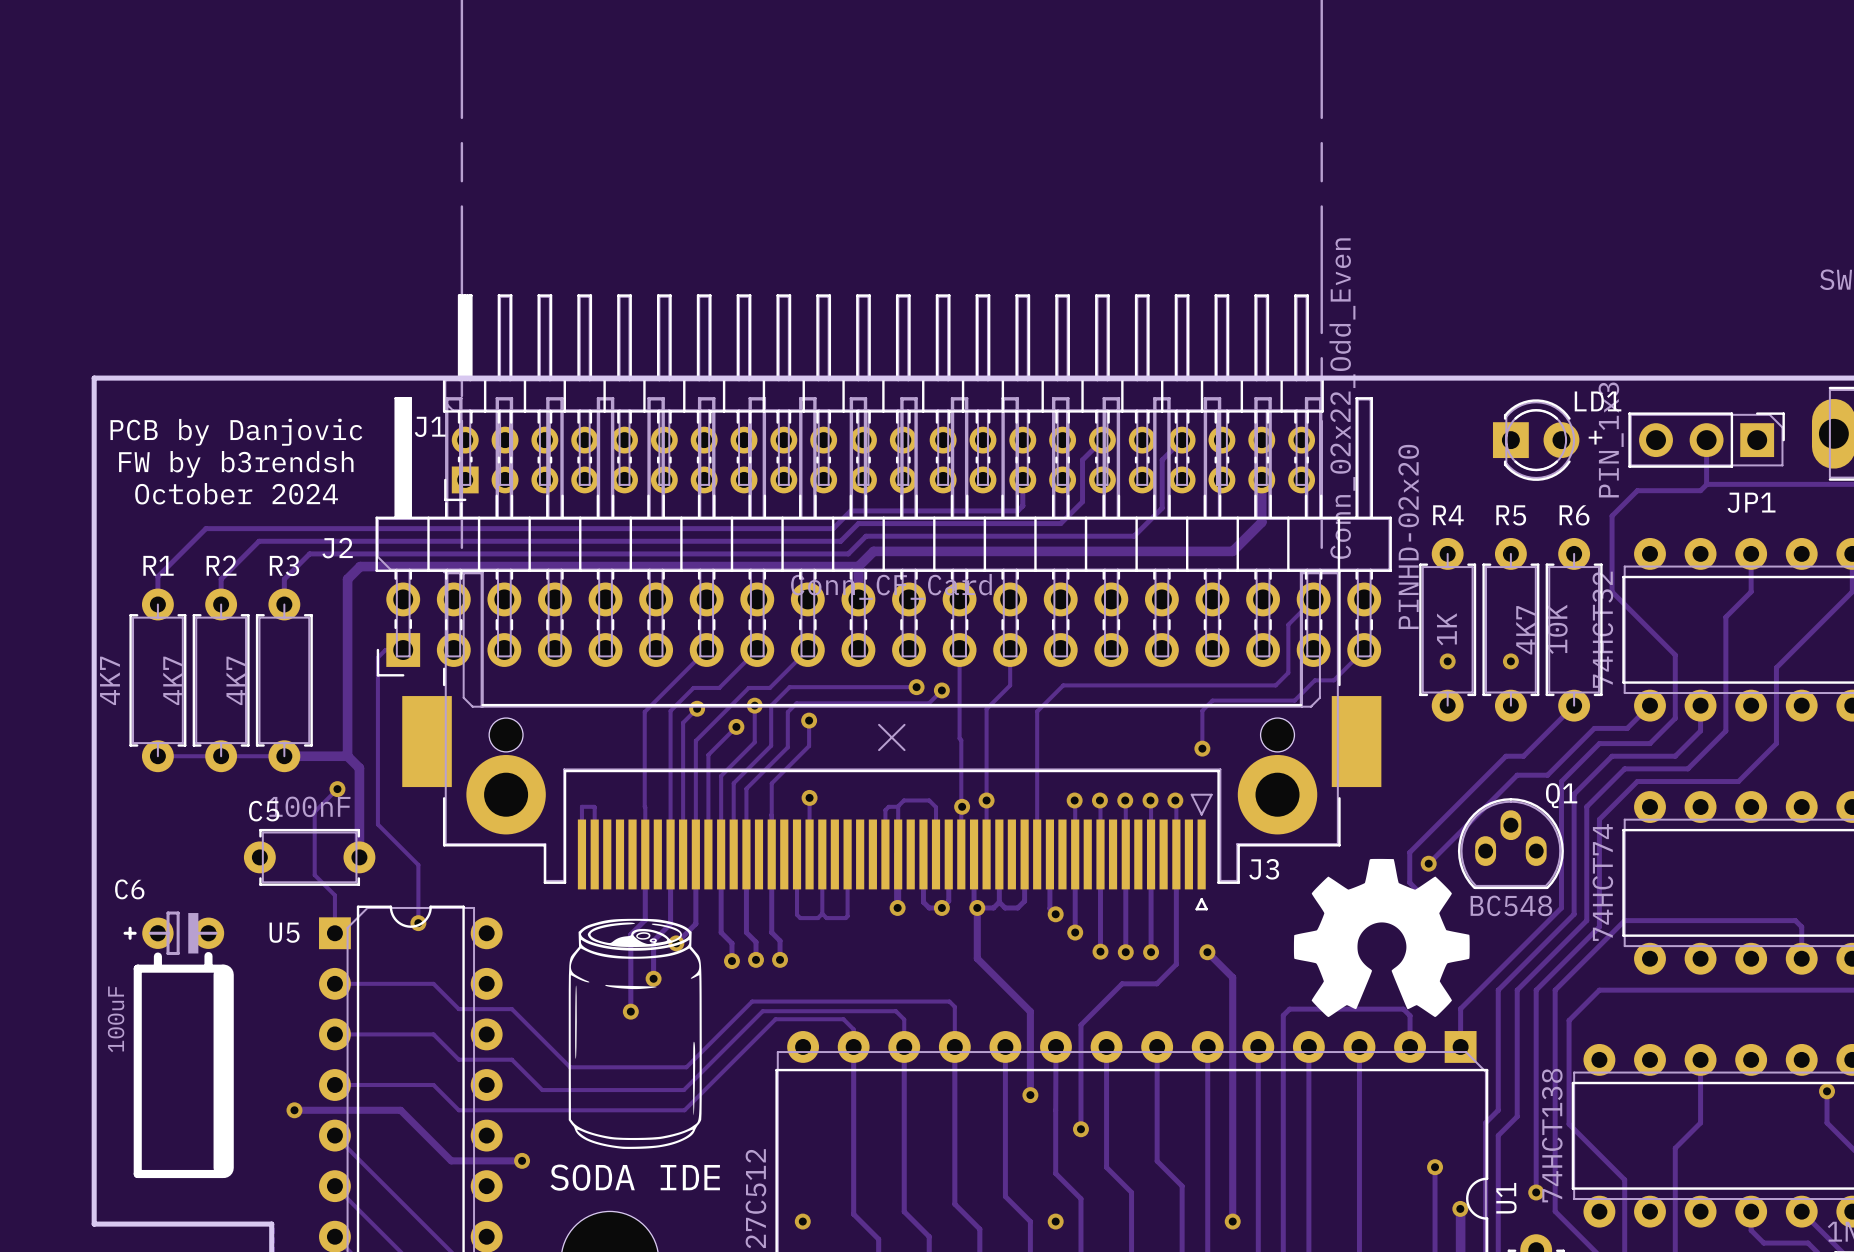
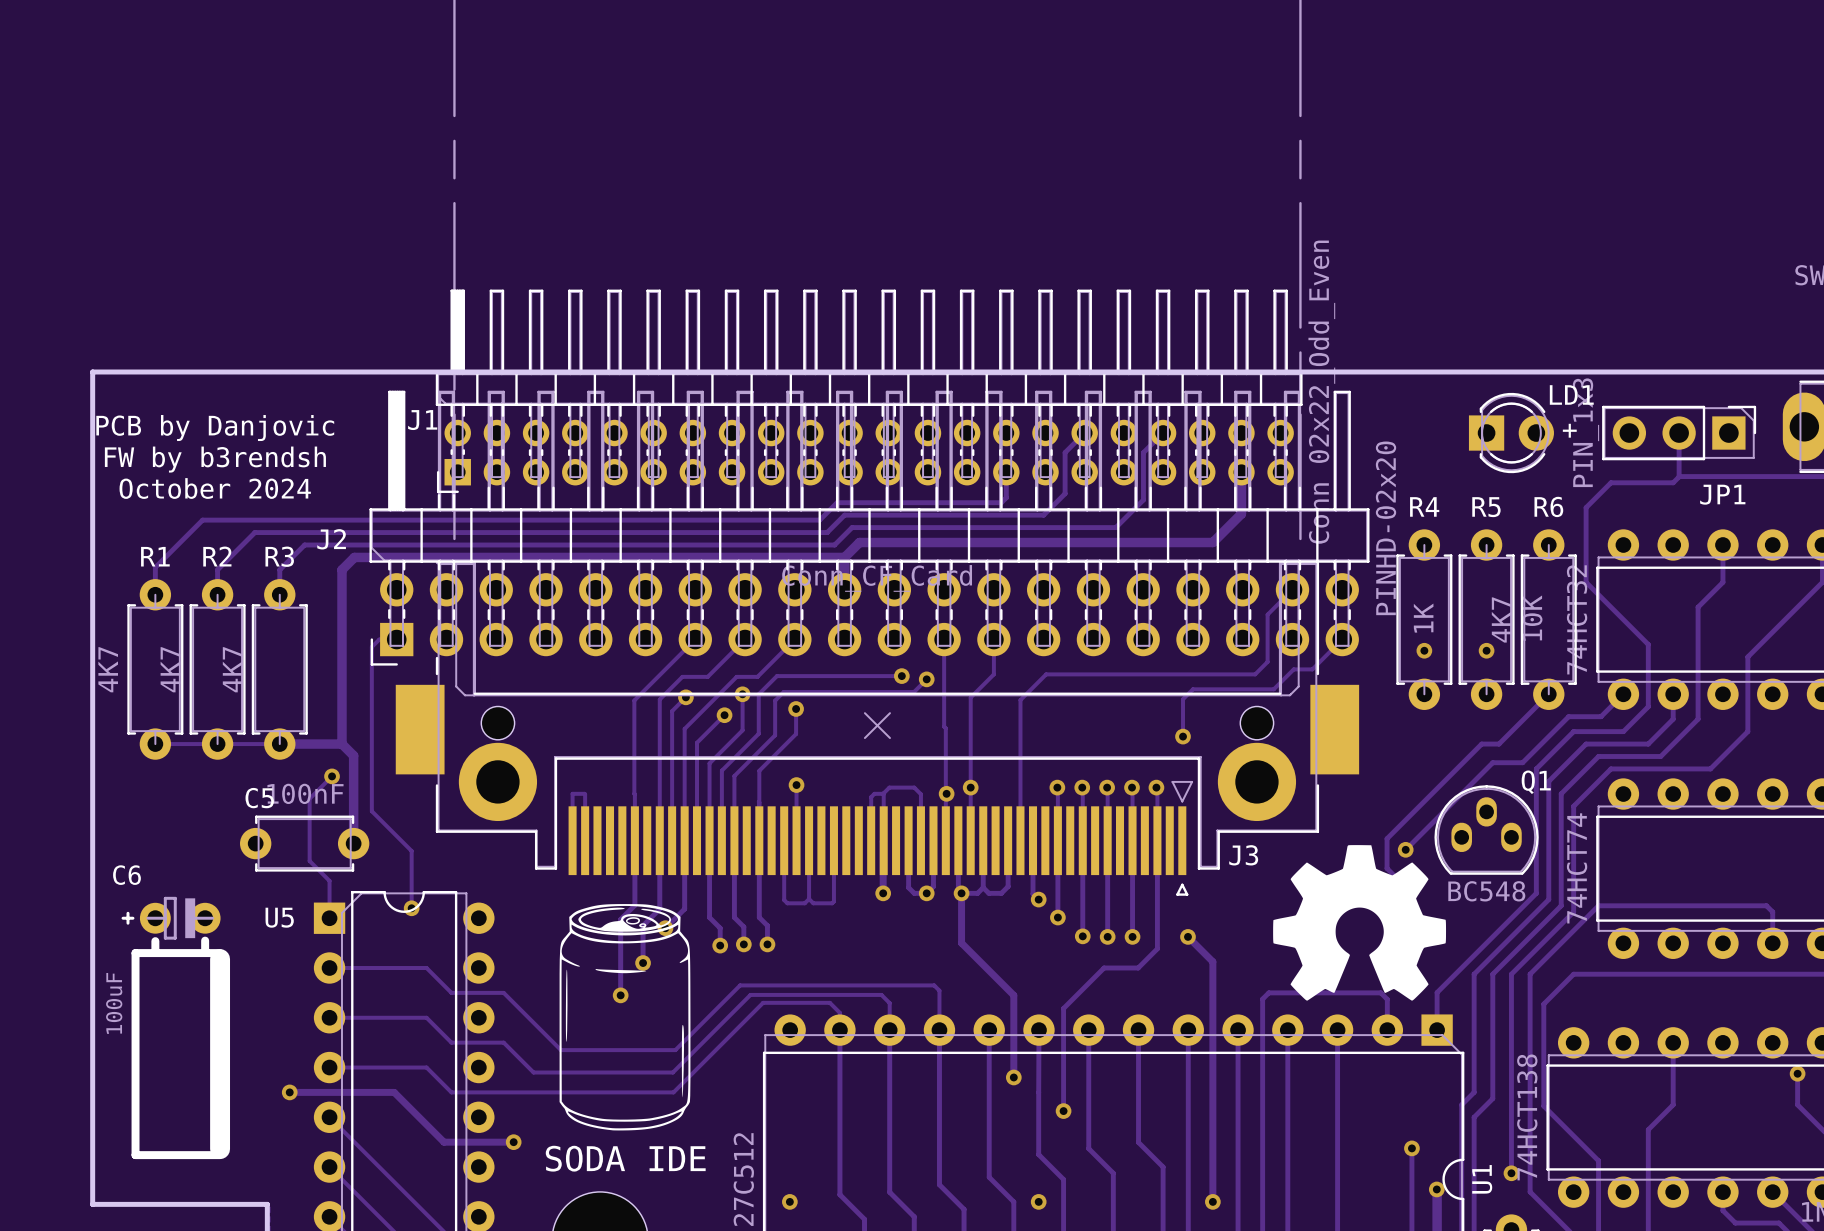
text position: PCB by Danjovic (236, 432) -> PCB by Danjovic (215, 428)
text position: FW by b3rendsh (236, 464) -> FW by b3rendsh (215, 459)
text position: October 2024 (236, 493) -> October 2024 (215, 488)

